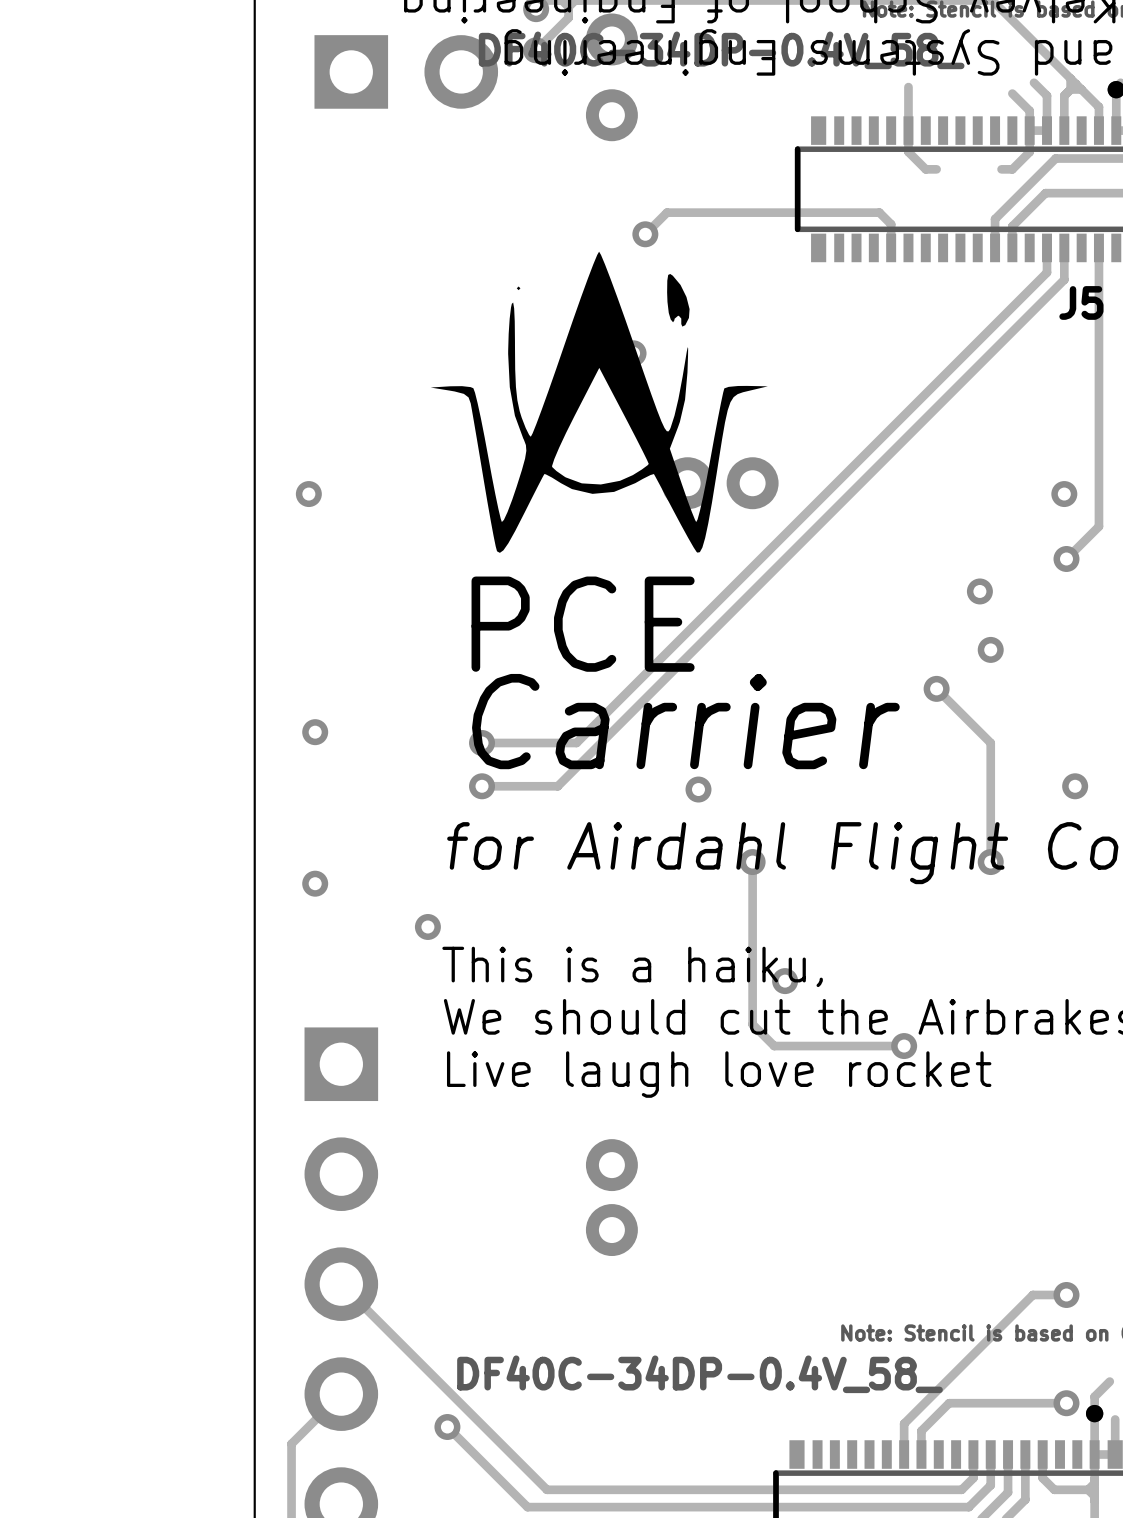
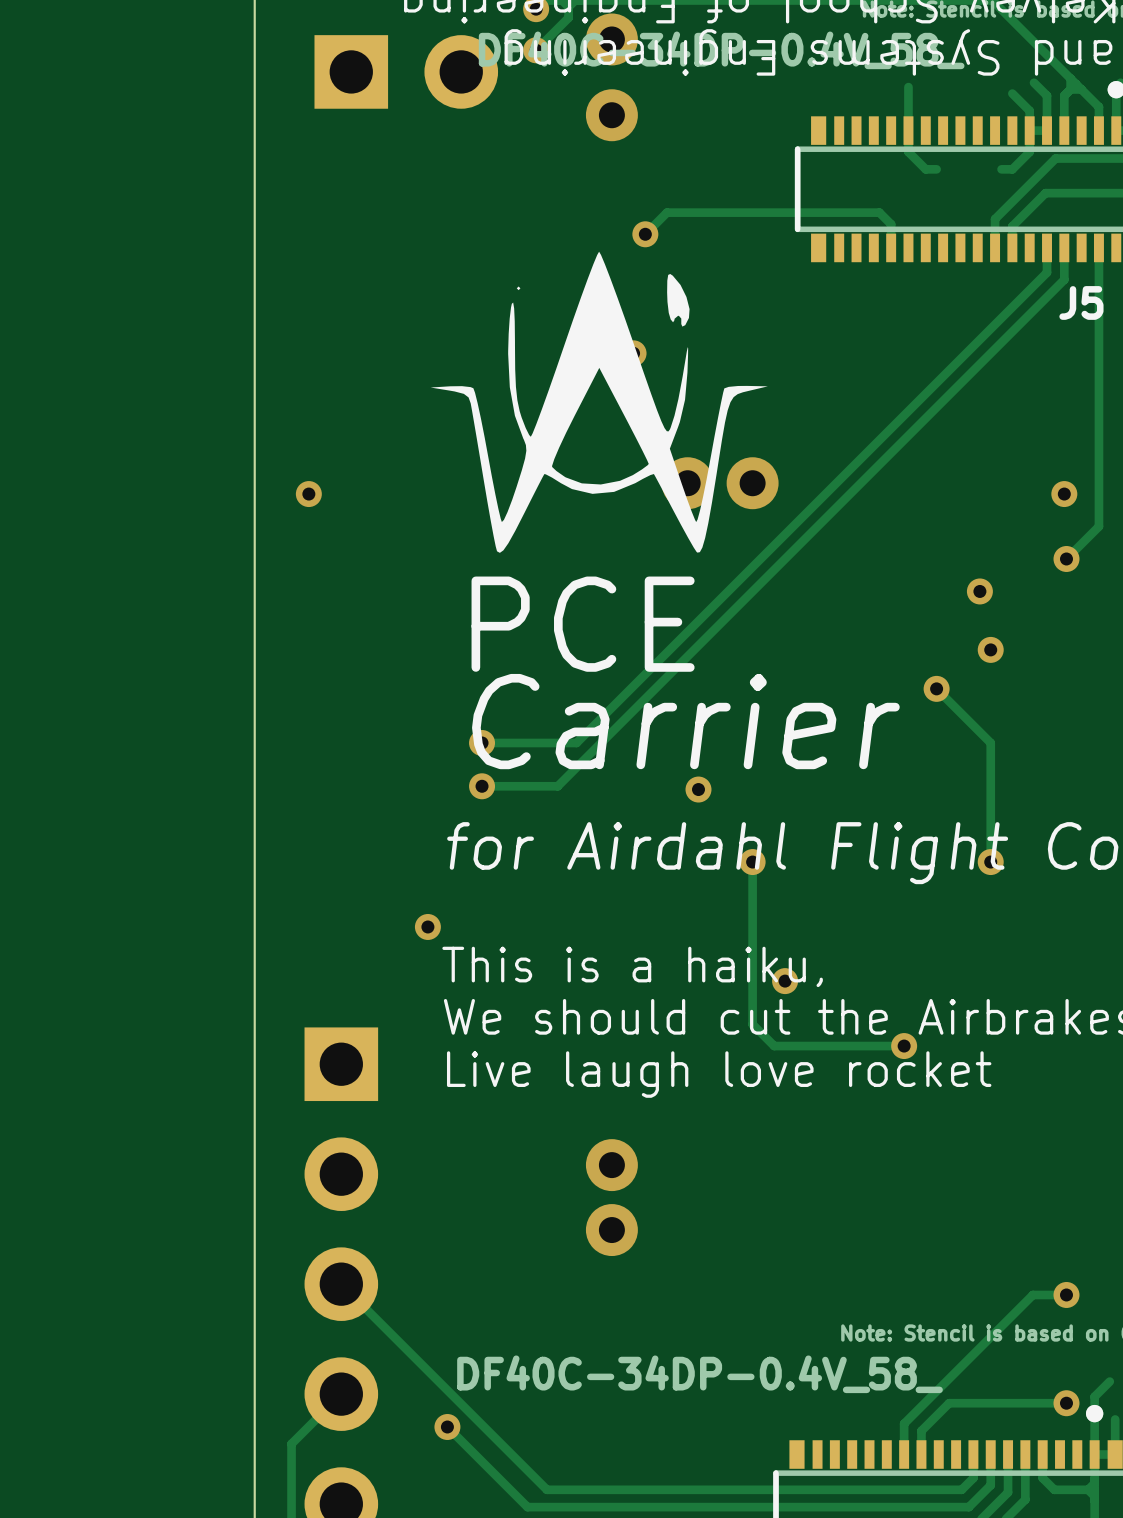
via: (315, 732) -> none
via: (1075, 786) -> none
via: (315, 883) -> none

